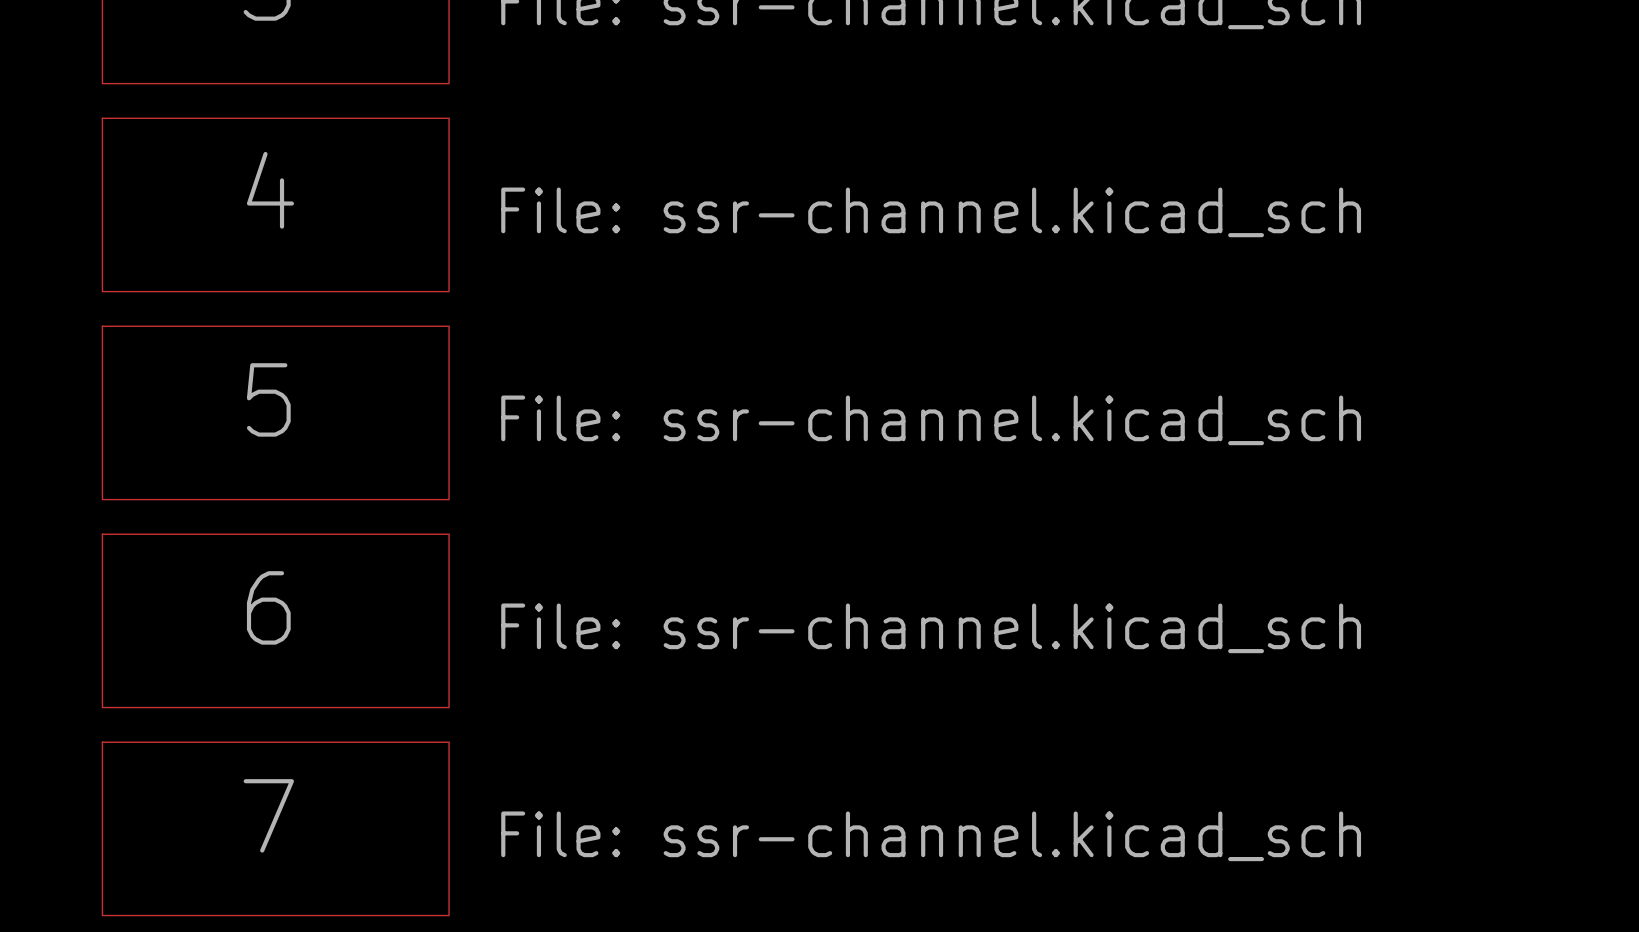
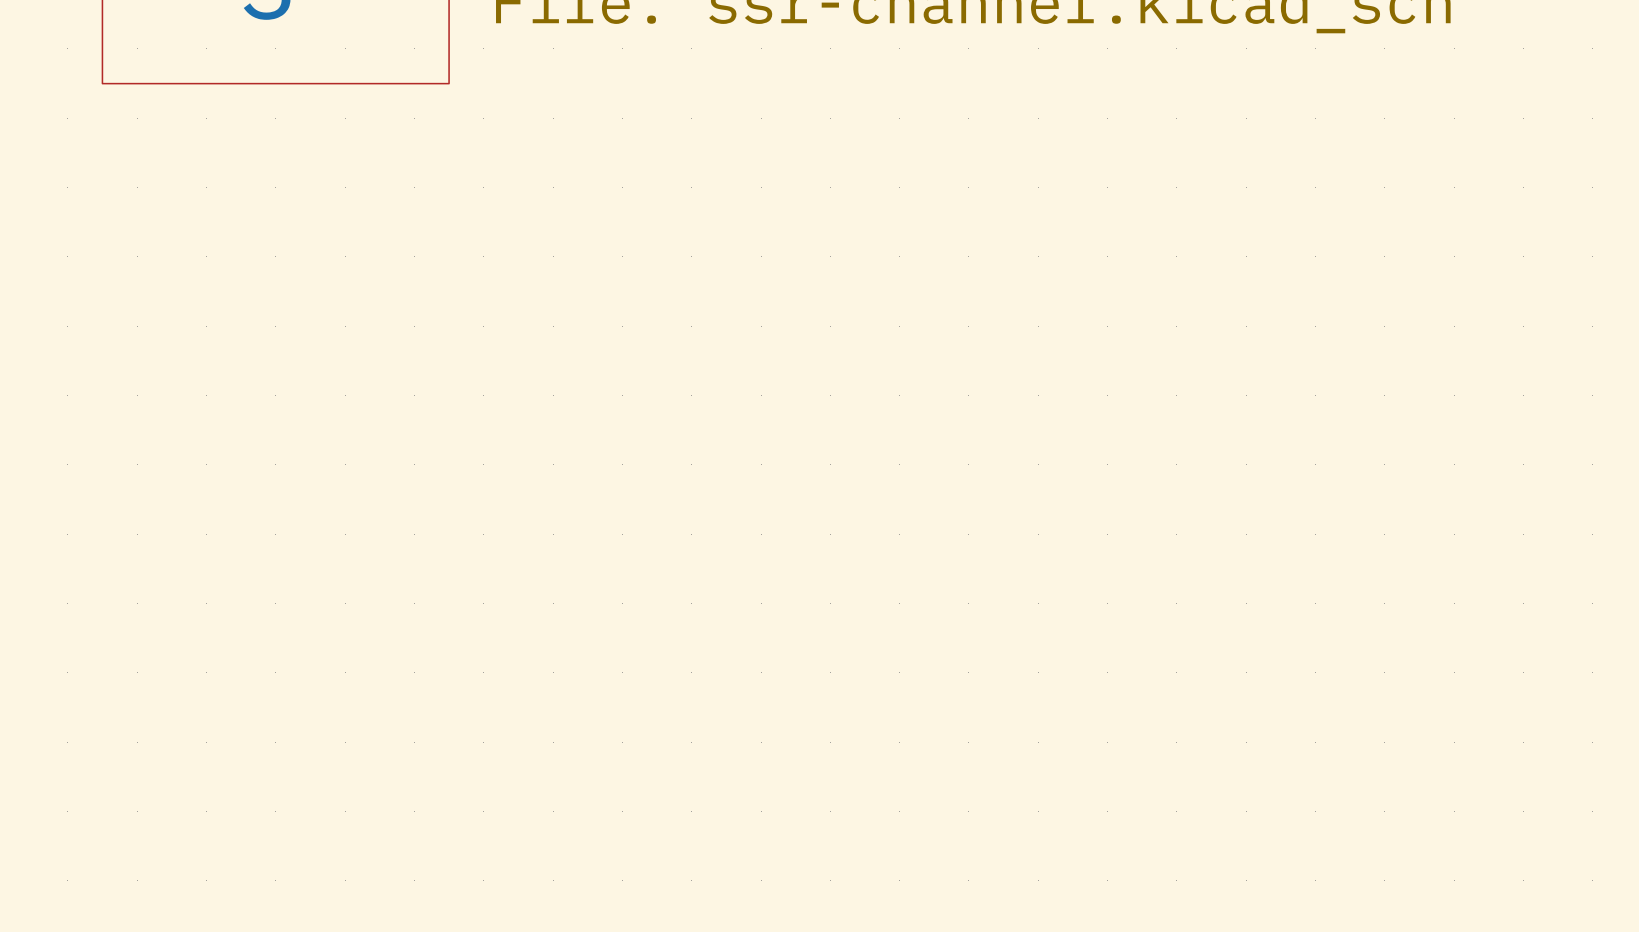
sheet: File: ssr-channel.kicad_sch (275, 204) -> none
sheet: File: ssr-channel.kicad_sch (275, 412) -> none
sheet: File: ssr-channel.kicad_sch (275, 620) -> none
sheet: File: ssr-channel.kicad_sch (275, 828) -> none

